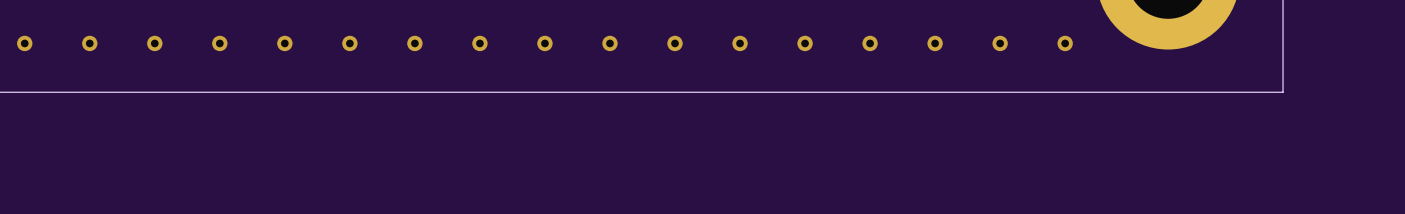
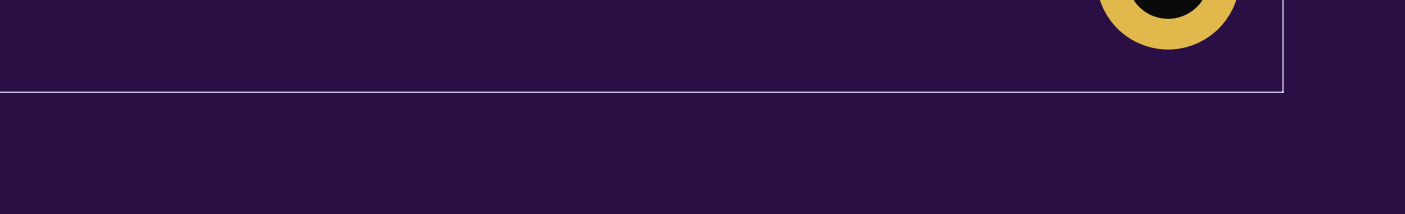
via: (24, 43) -> none
via: (89, 43) -> none
via: (154, 43) -> none
via: (219, 43) -> none
via: (284, 43) -> none
via: (349, 43) -> none
via: (414, 43) -> none
via: (479, 43) -> none
via: (544, 43) -> none
via: (609, 43) -> none
via: (675, 43) -> none
via: (740, 43) -> none
via: (805, 43) -> none
via: (870, 43) -> none
via: (935, 43) -> none
via: (1000, 43) -> none
via: (1065, 43) -> none

